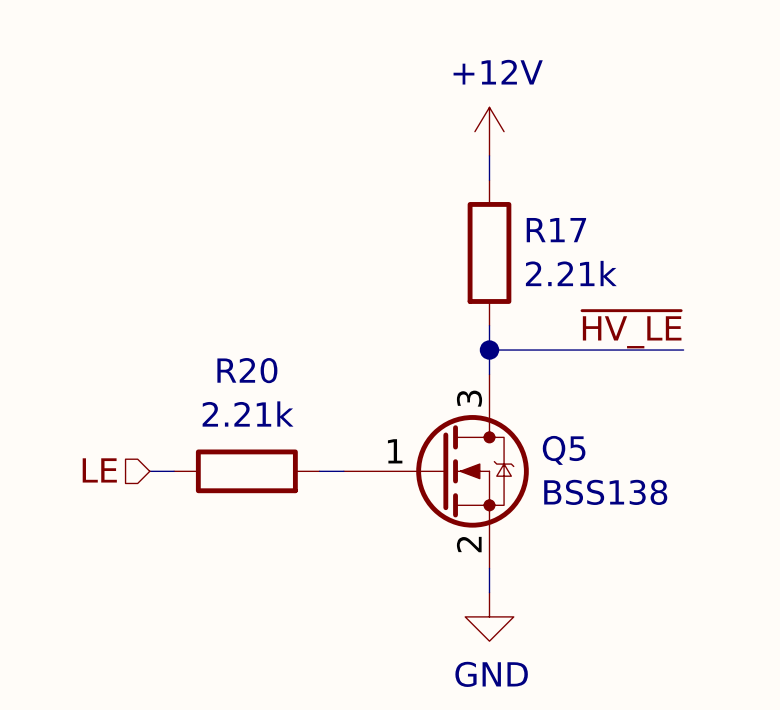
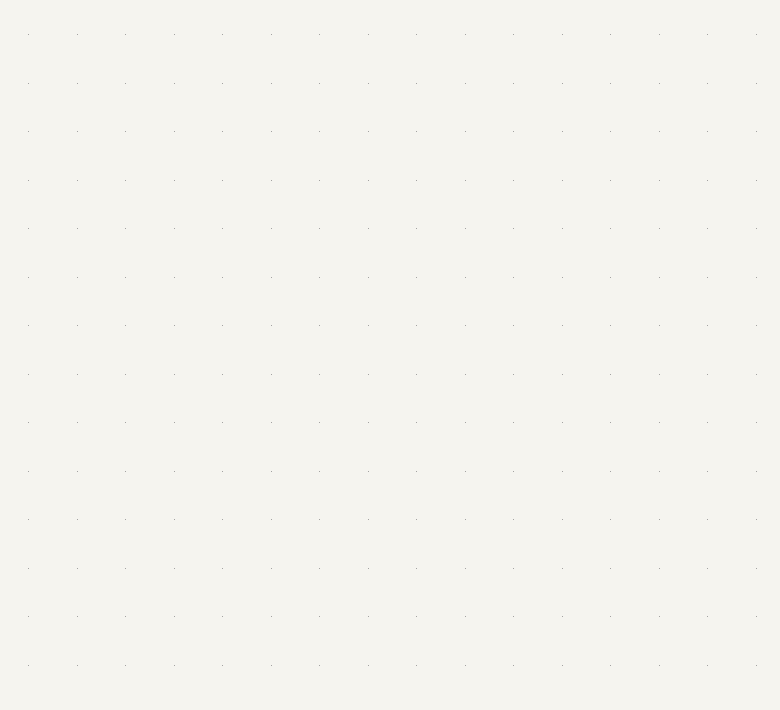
power symbol: +12V (489, 131) -> none
wire: (489, 155) (489, 180) -> none
R17: 2.21k (489, 252) -> none
wire: (489, 325) (489, 374) -> none
label: ~{HV_LE} (631, 329) -> none
wire: (489, 350) (683, 350) -> none
junction: (489, 350) -> none
hierarchical label: LE (99, 470) -> none
wire: (149, 471) (174, 471) -> none
R20: 2.21k (246, 471) -> none
wire: (319, 471) (343, 471) -> none
Q5: BSS138 (436, 471) -> none
wire: (489, 568) (489, 592) -> none
power symbol: GND (489, 616) -> none

